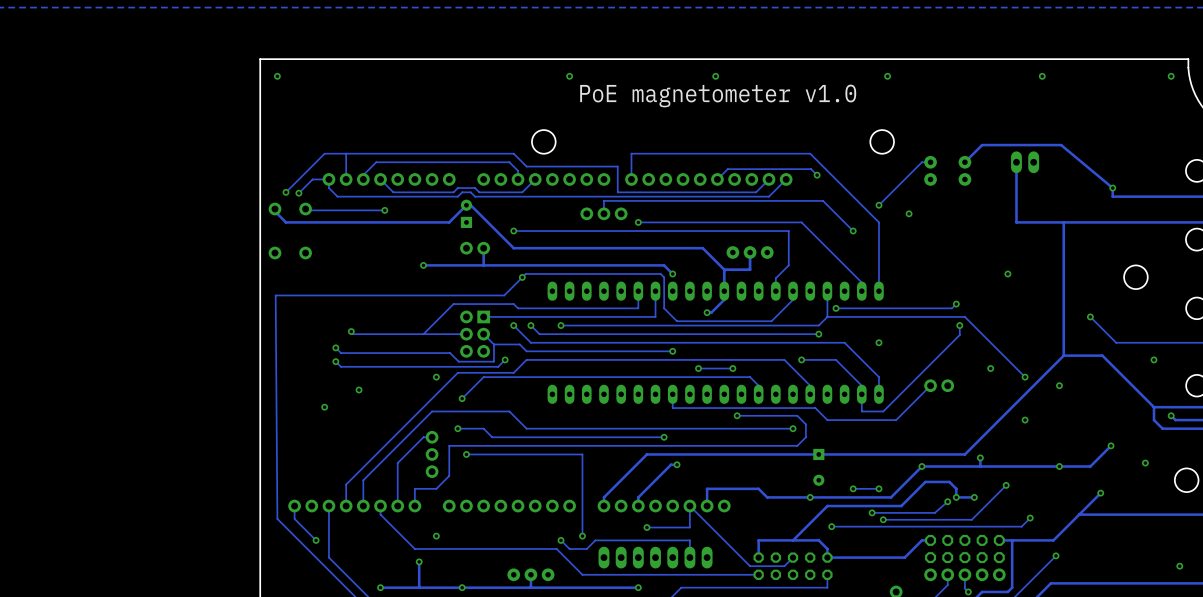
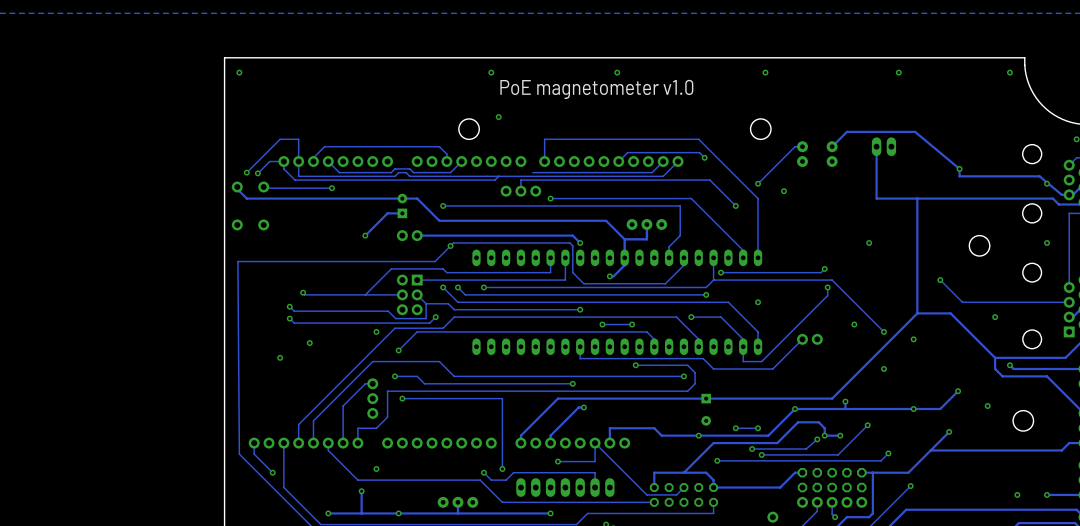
via: none -> (498, 117)
track: (346, 153) (513, 153) (526, 166) (617, 166) (617, 192) -> none
track: (346, 196) (337, 196) -> (298, 176) (298, 161)
track: none -> (498, 176) (495, 180) (294, 180) (291, 176)
part position: (466, 213) -> (402, 205)
track: (449, 222) (466, 205) (470, 205) (513, 248) -> (387, 198) (417, 198) (439, 220) (443, 220)
part position: (475, 248) -> (409, 235)
track: (483, 248) (483, 265) (423, 265) -> (402, 213) (387, 213) (365, 235)

